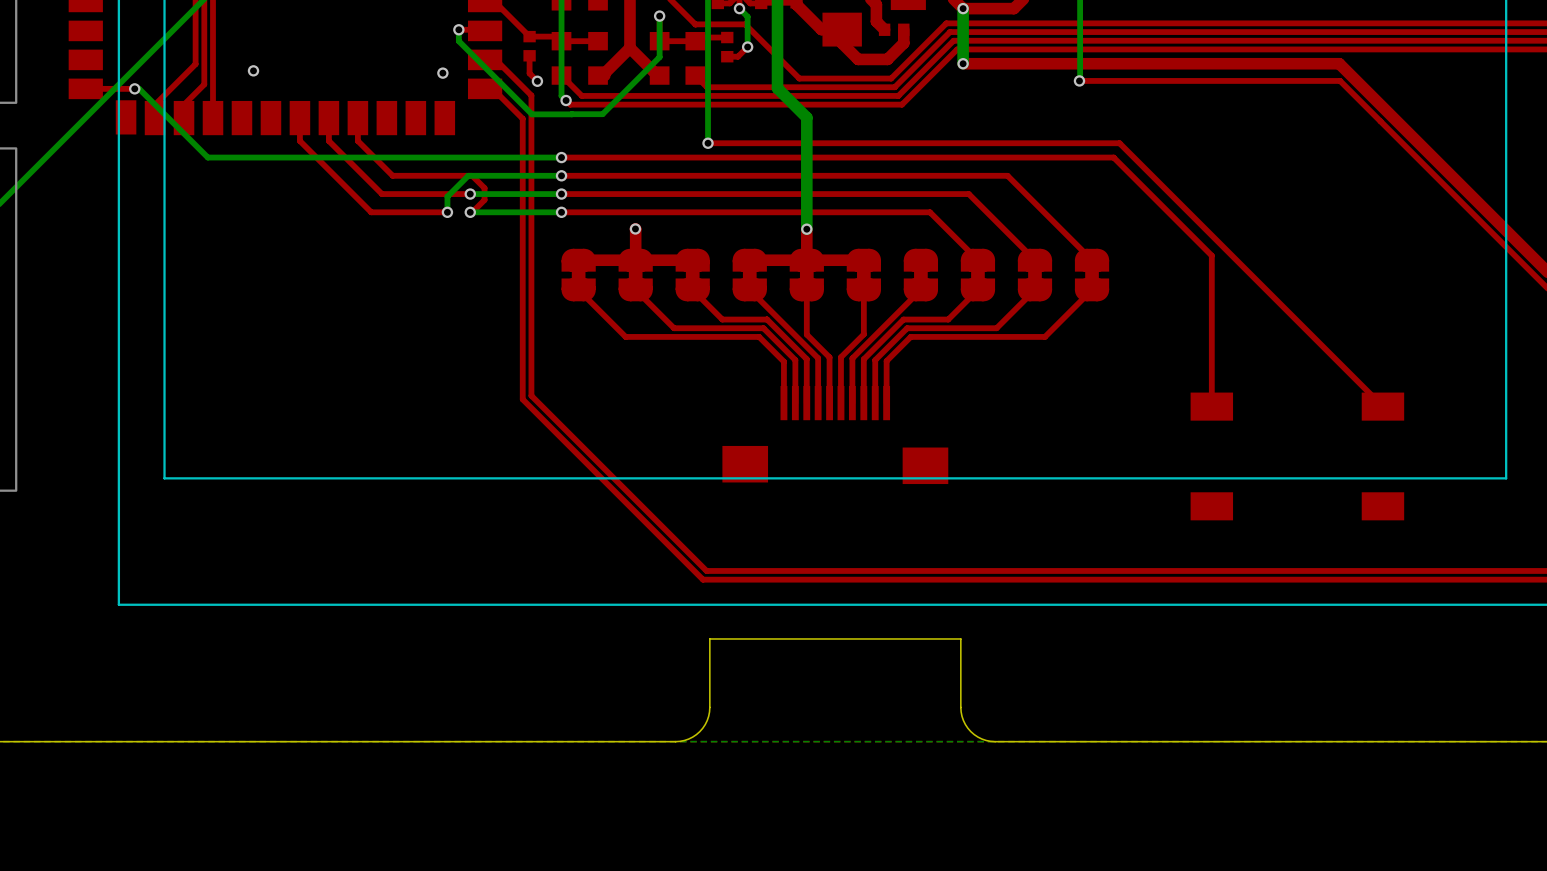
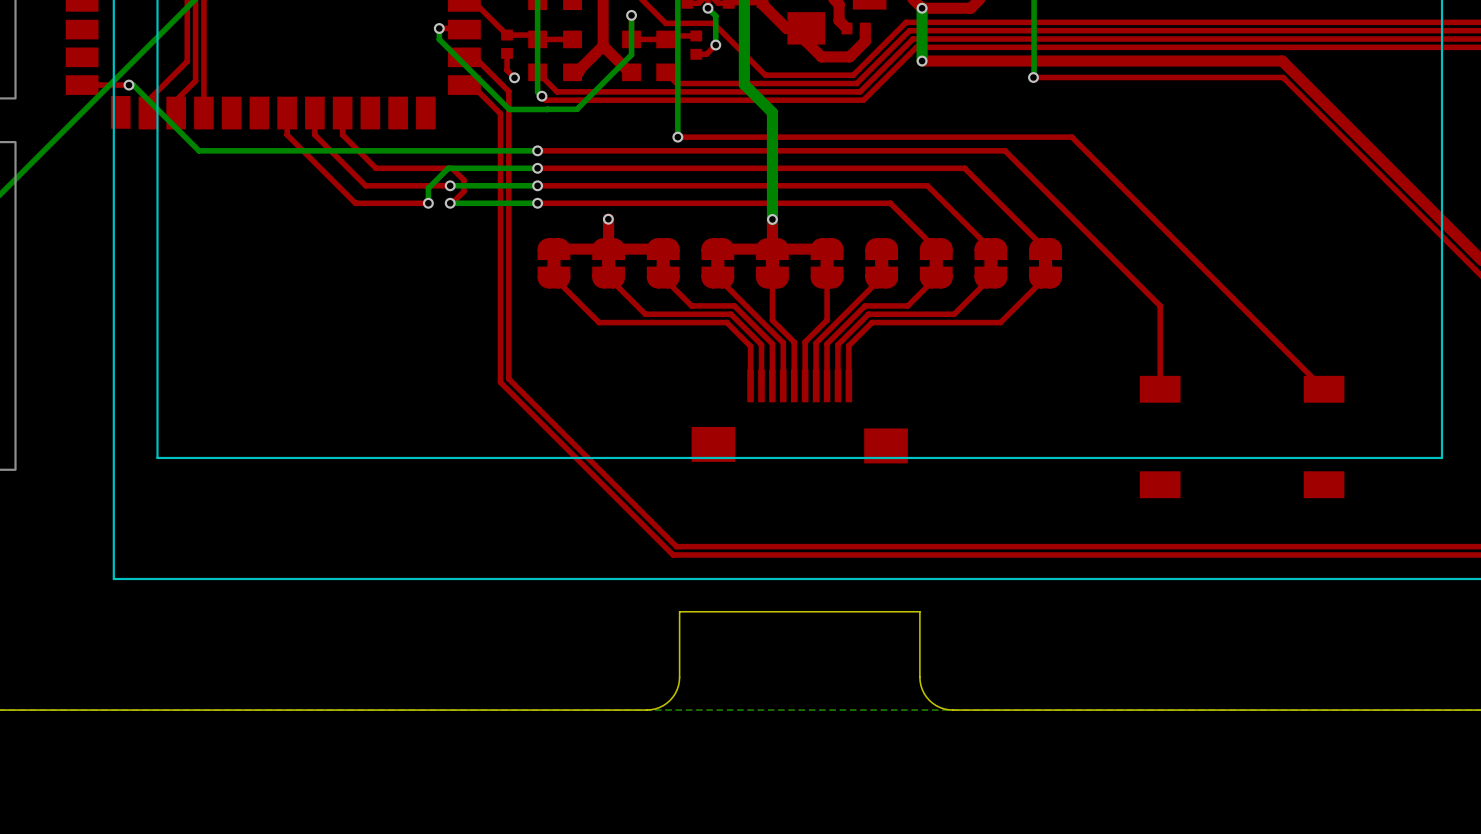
via: (253, 70) -> none
via: (442, 73) -> none
top track: (1049, 157) (1113, 157) (1211, 255) (1211, 319) -> (1005, 150) (1160, 305)

